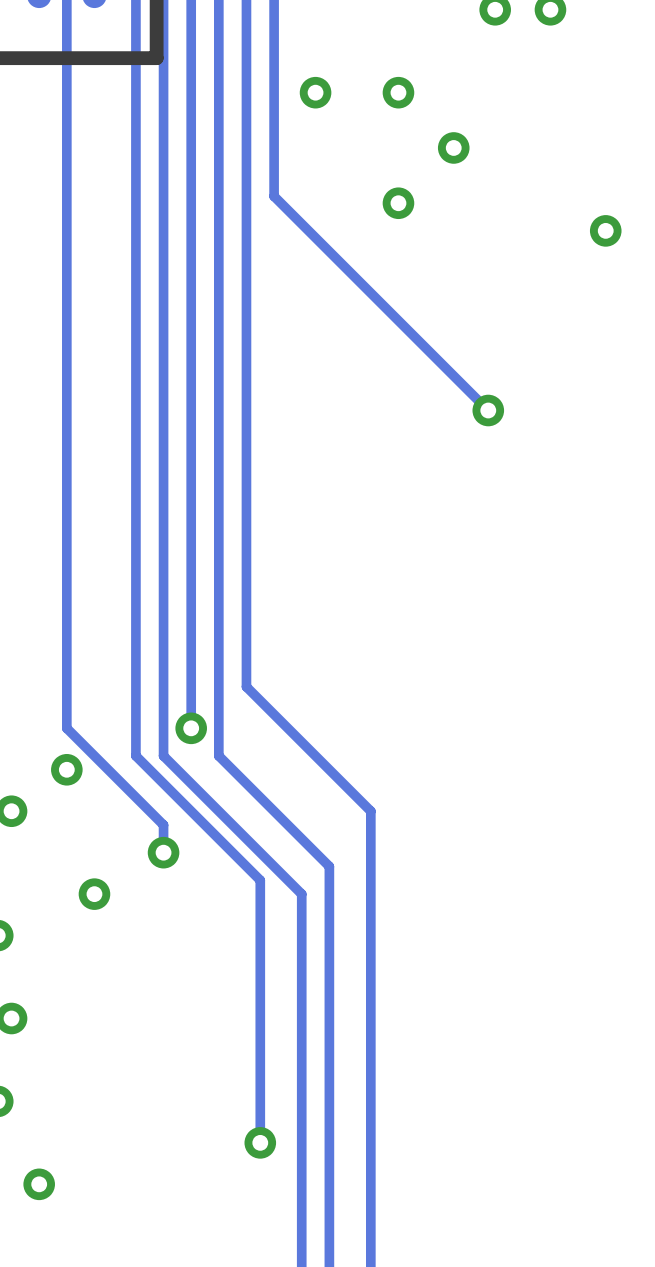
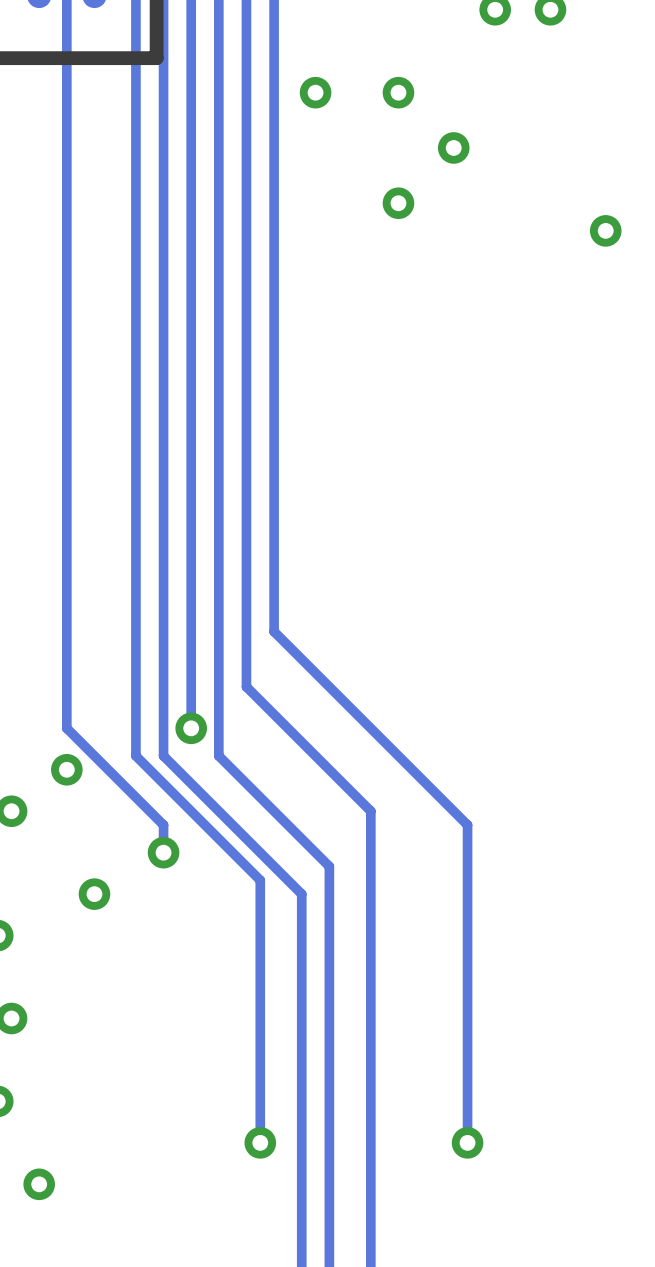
track: (274, 196) (488, 410) -> (274, 196) (274, 631) (467, 825) (467, 1142)
via: (488, 410) -> none
via: none -> (467, 1142)

